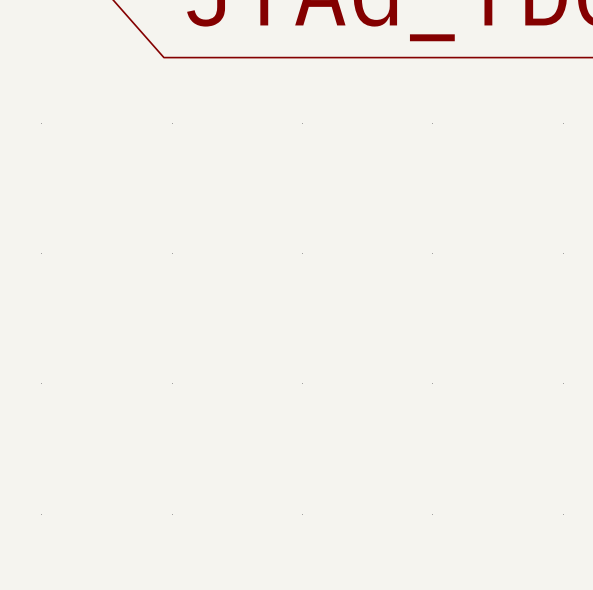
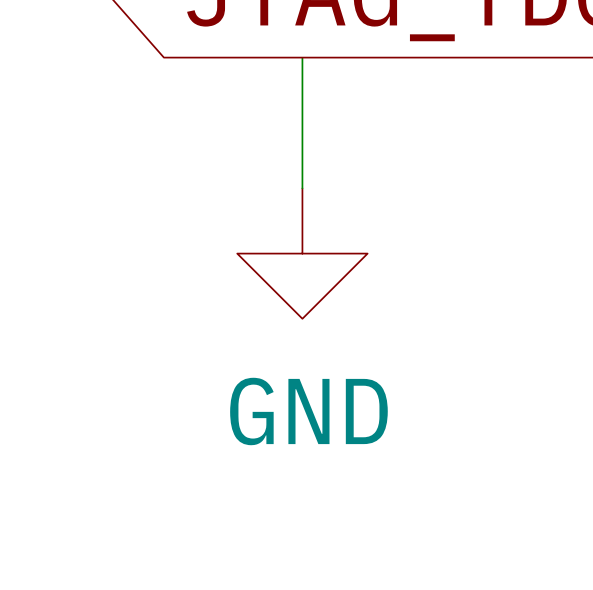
wire: none -> (302, 58) (302, 188)
power symbol: none -> GND (302, 253)

